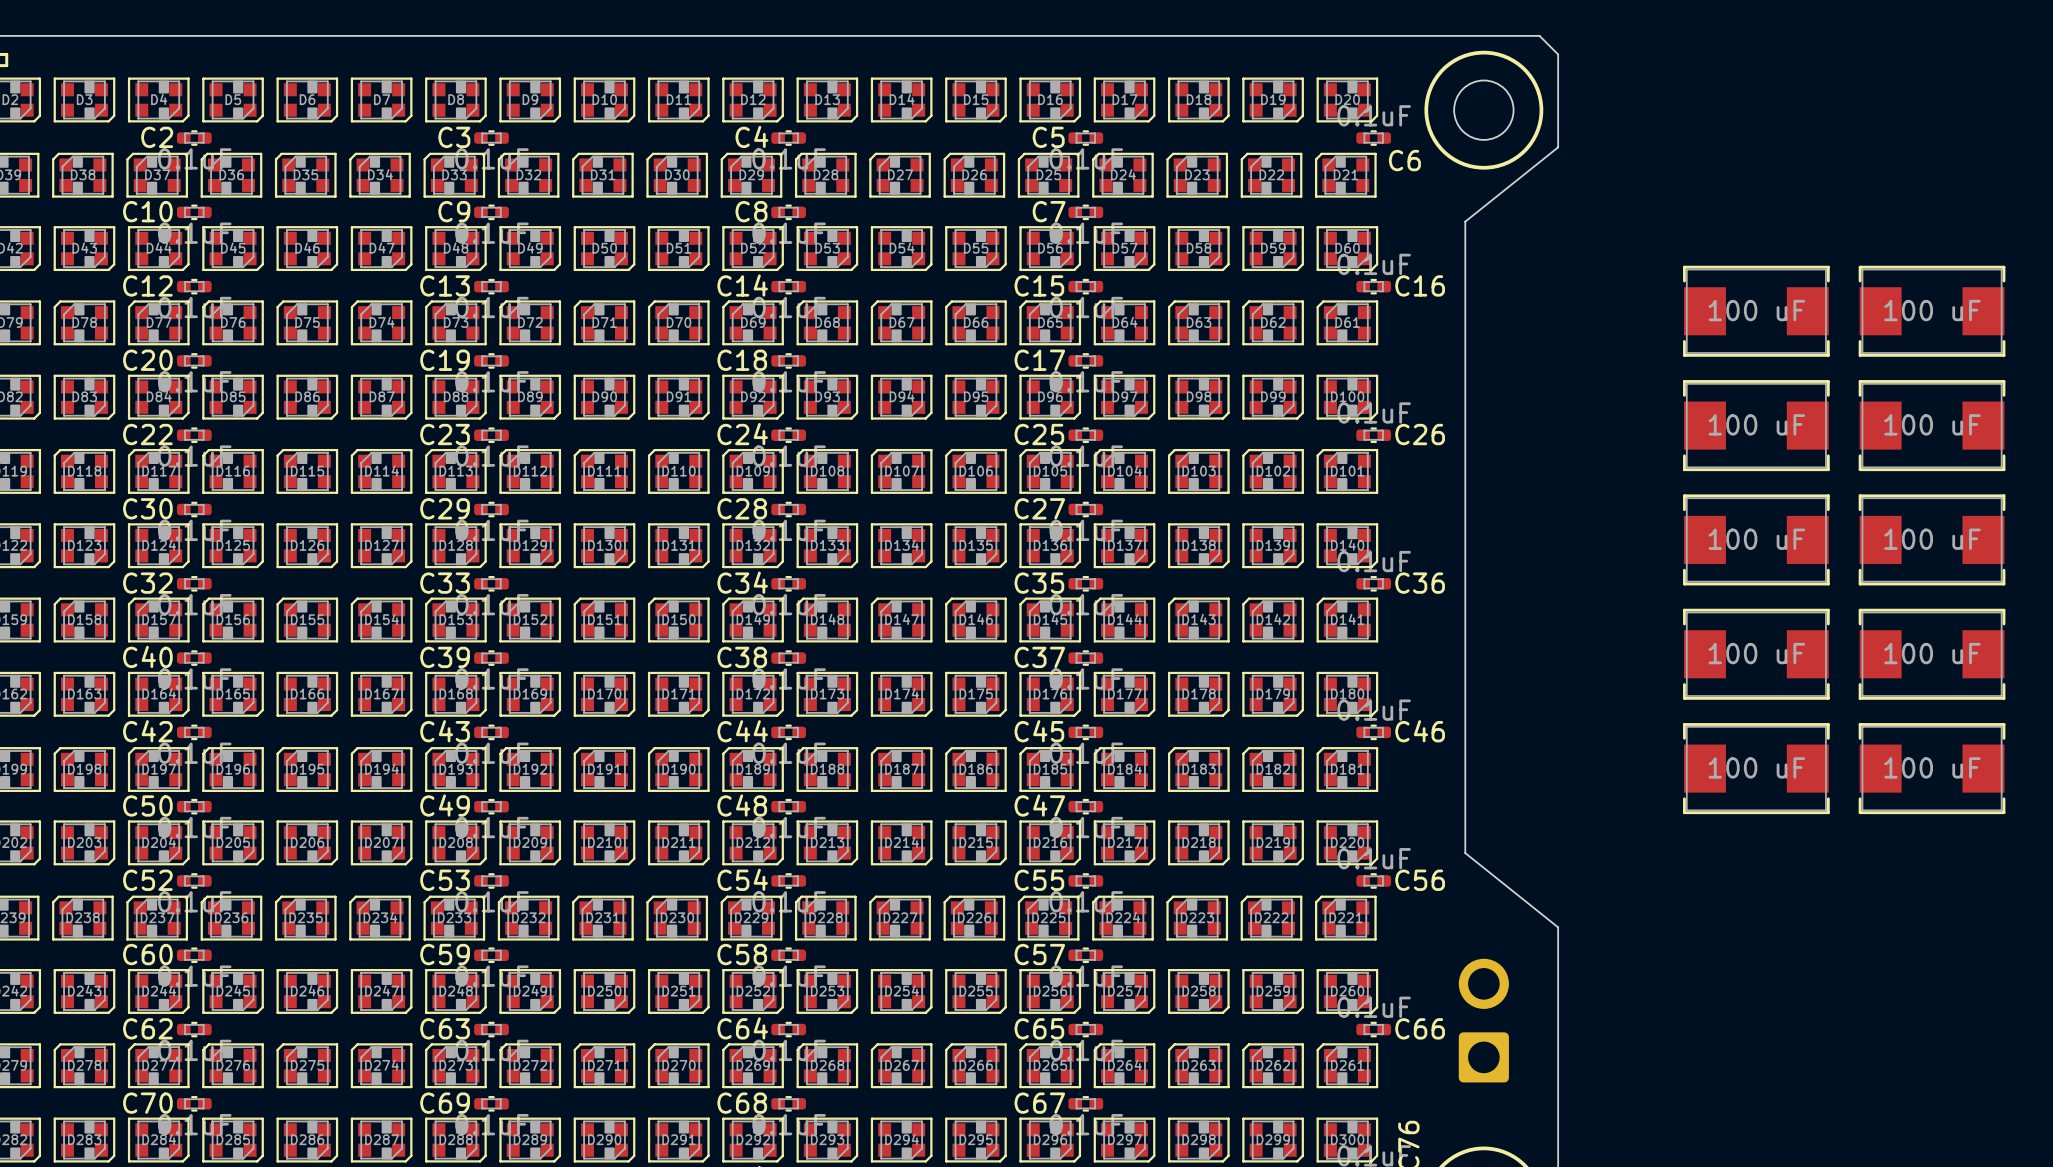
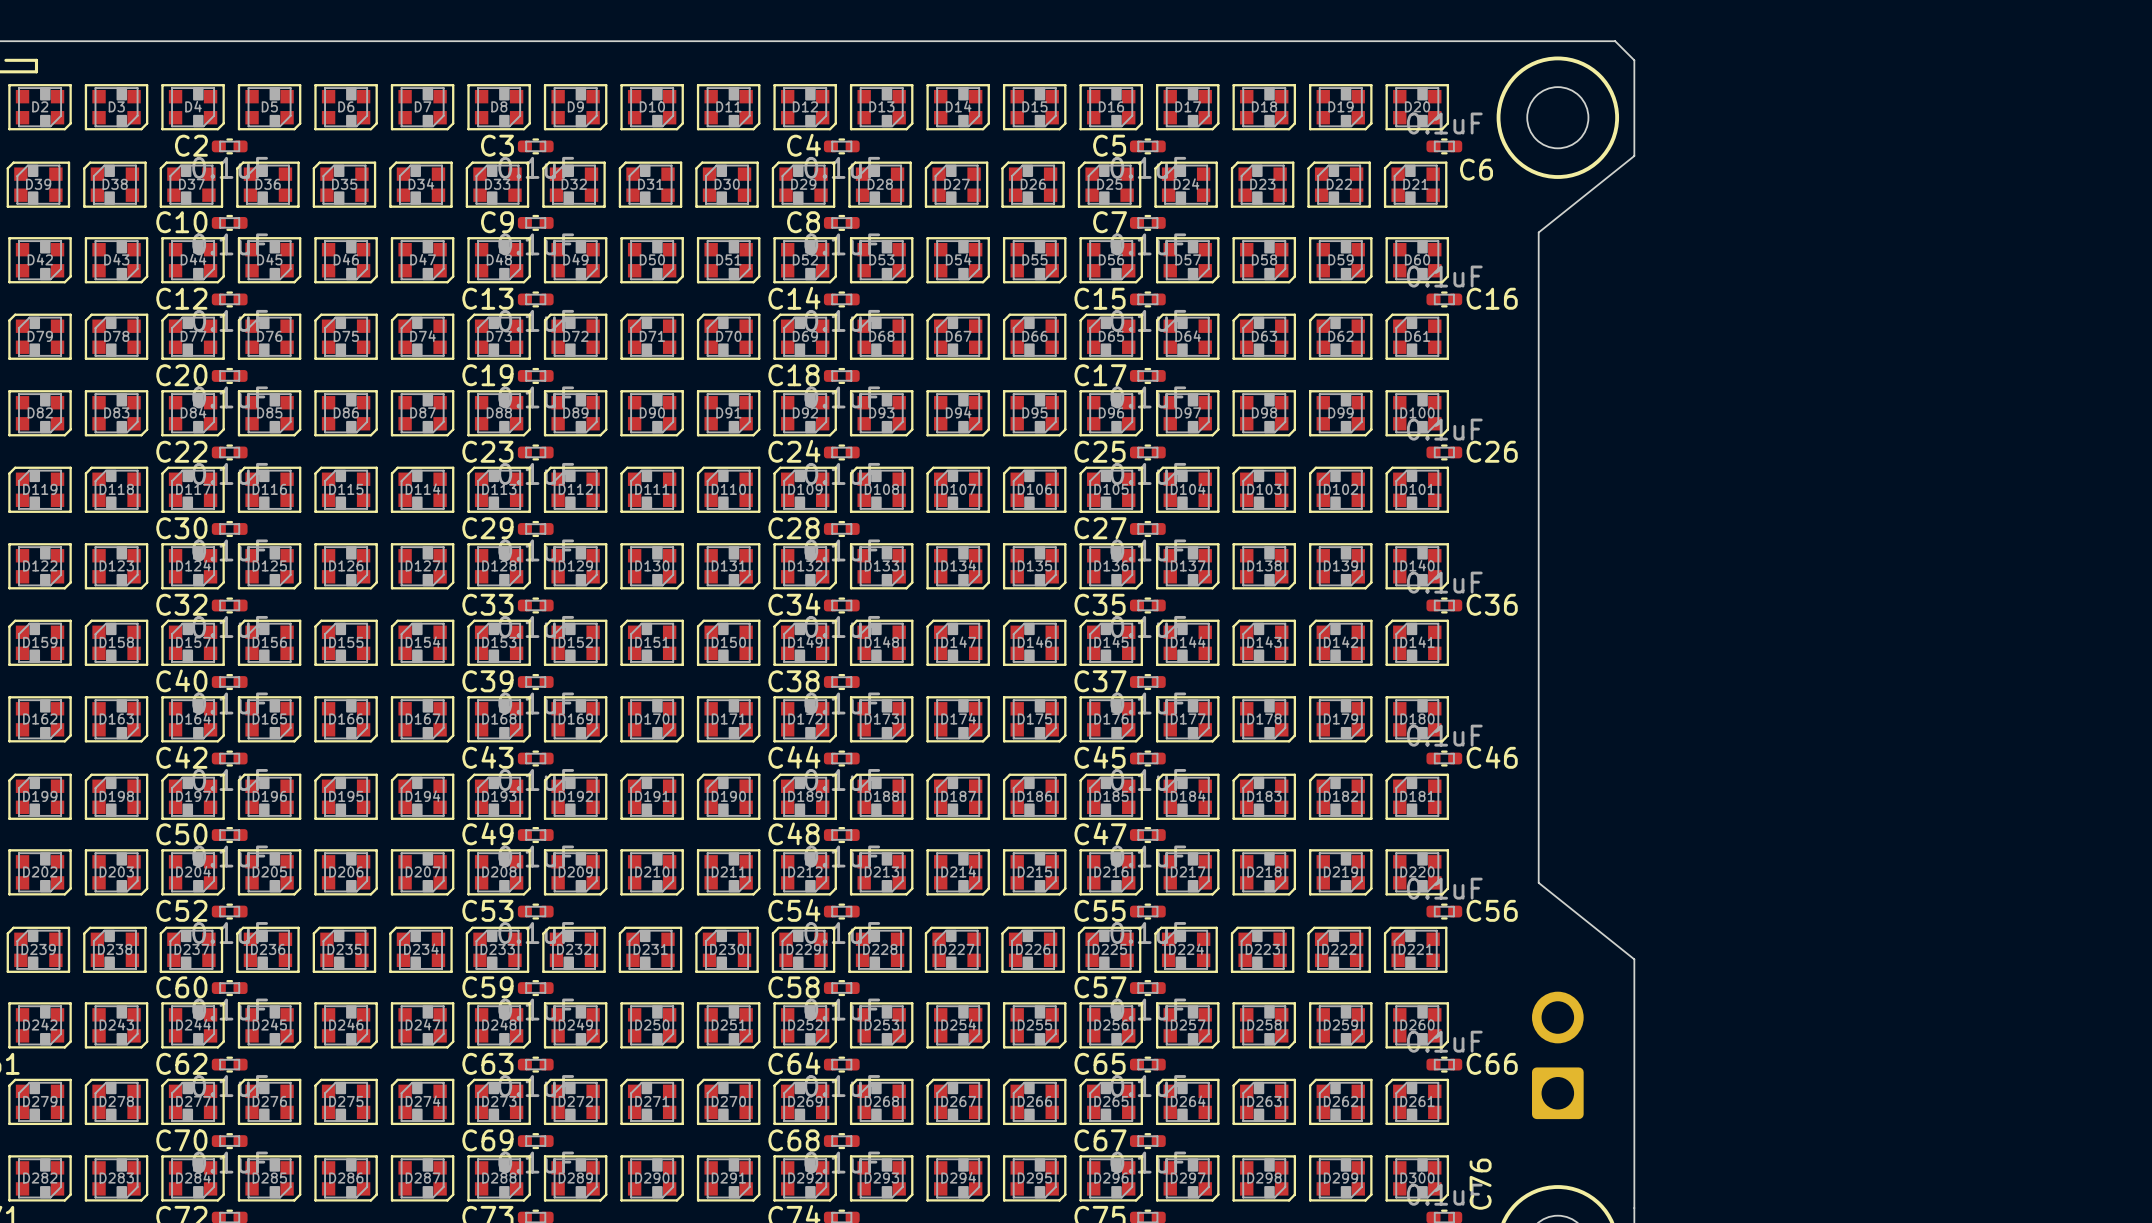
part: 100 uF (1756, 311) -> none
part: 100 uF (1932, 311) -> none
part: 100 uF (1756, 425) -> none
part: 100 uF (1932, 425) -> none
part: 100 uF (1756, 539) -> none
part: 100 uF (1932, 539) -> none
part: 100 uF (1756, 654) -> none
part: 100 uF (1932, 654) -> none
part: 100 uF (1756, 768) -> none
part: 100 uF (1932, 768) -> none

